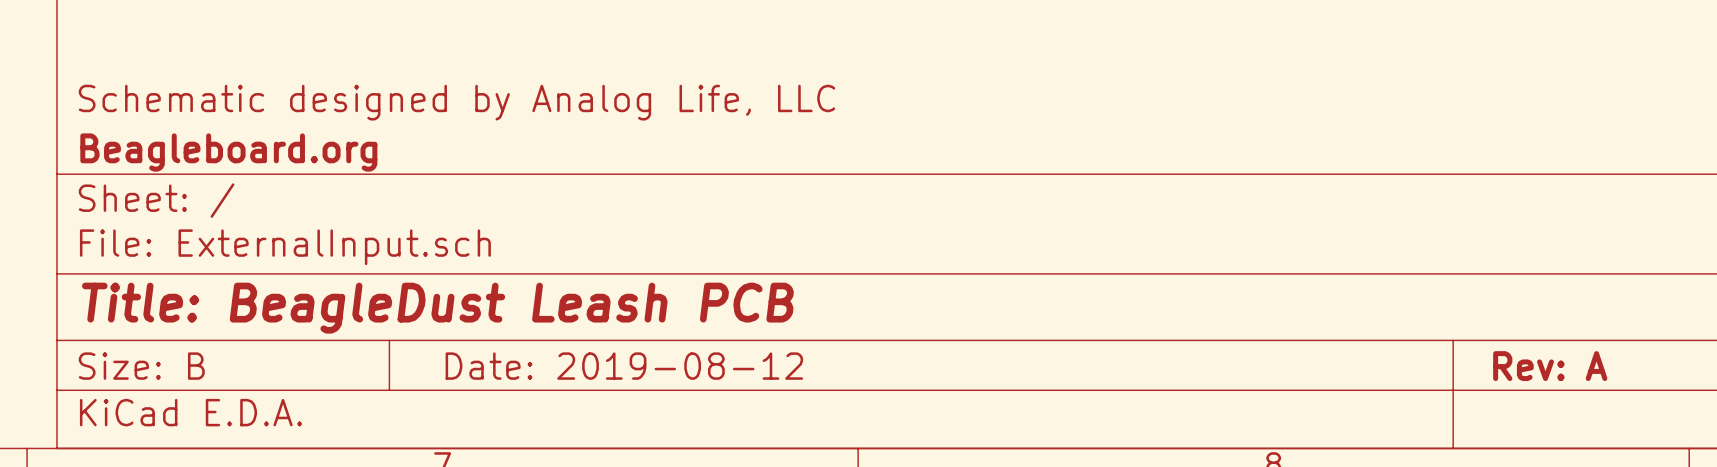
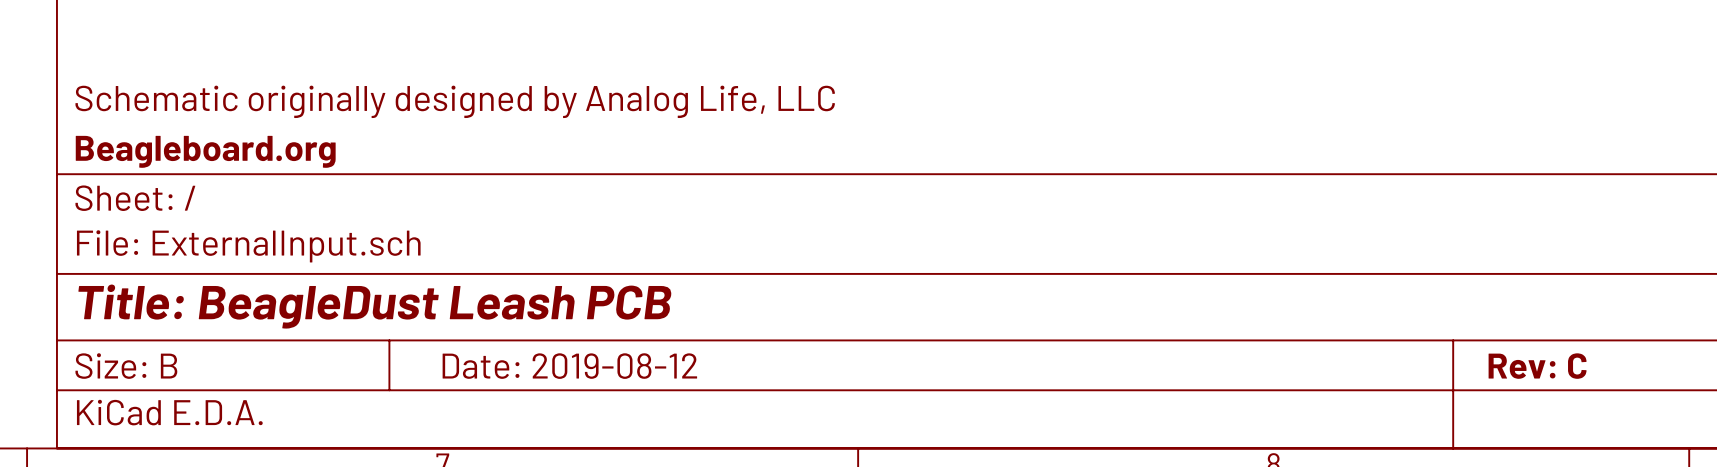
title block: Schematic designed by Analog Life, LLC (456, 102) -> Schematic originally designed by Analog Life, LLC (455, 101)
title block: Rev: A (1550, 366) -> Rev: C (1537, 366)

